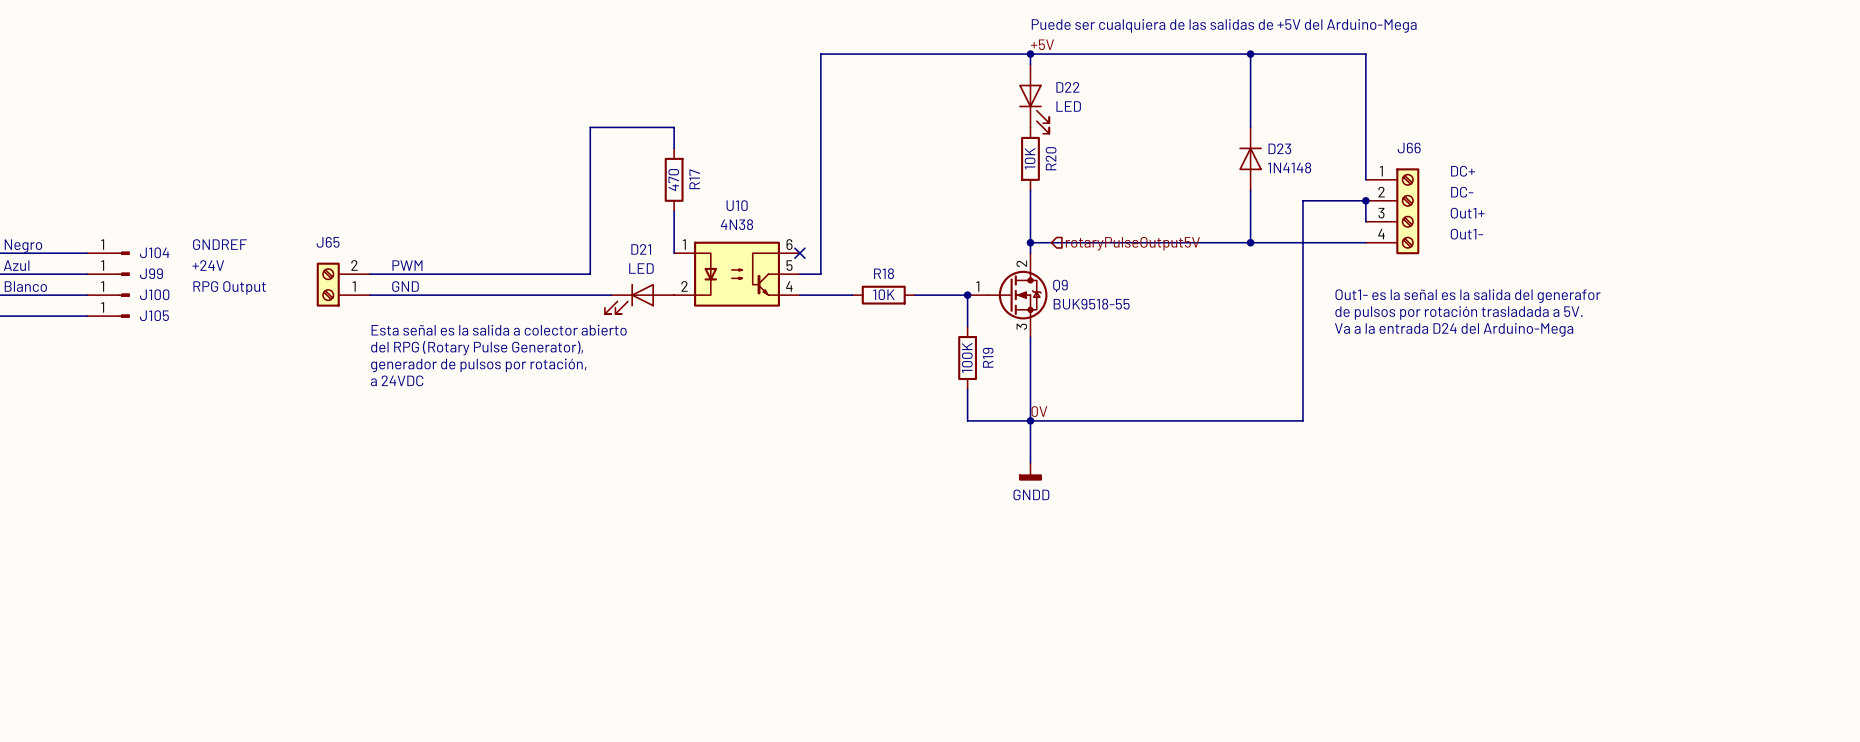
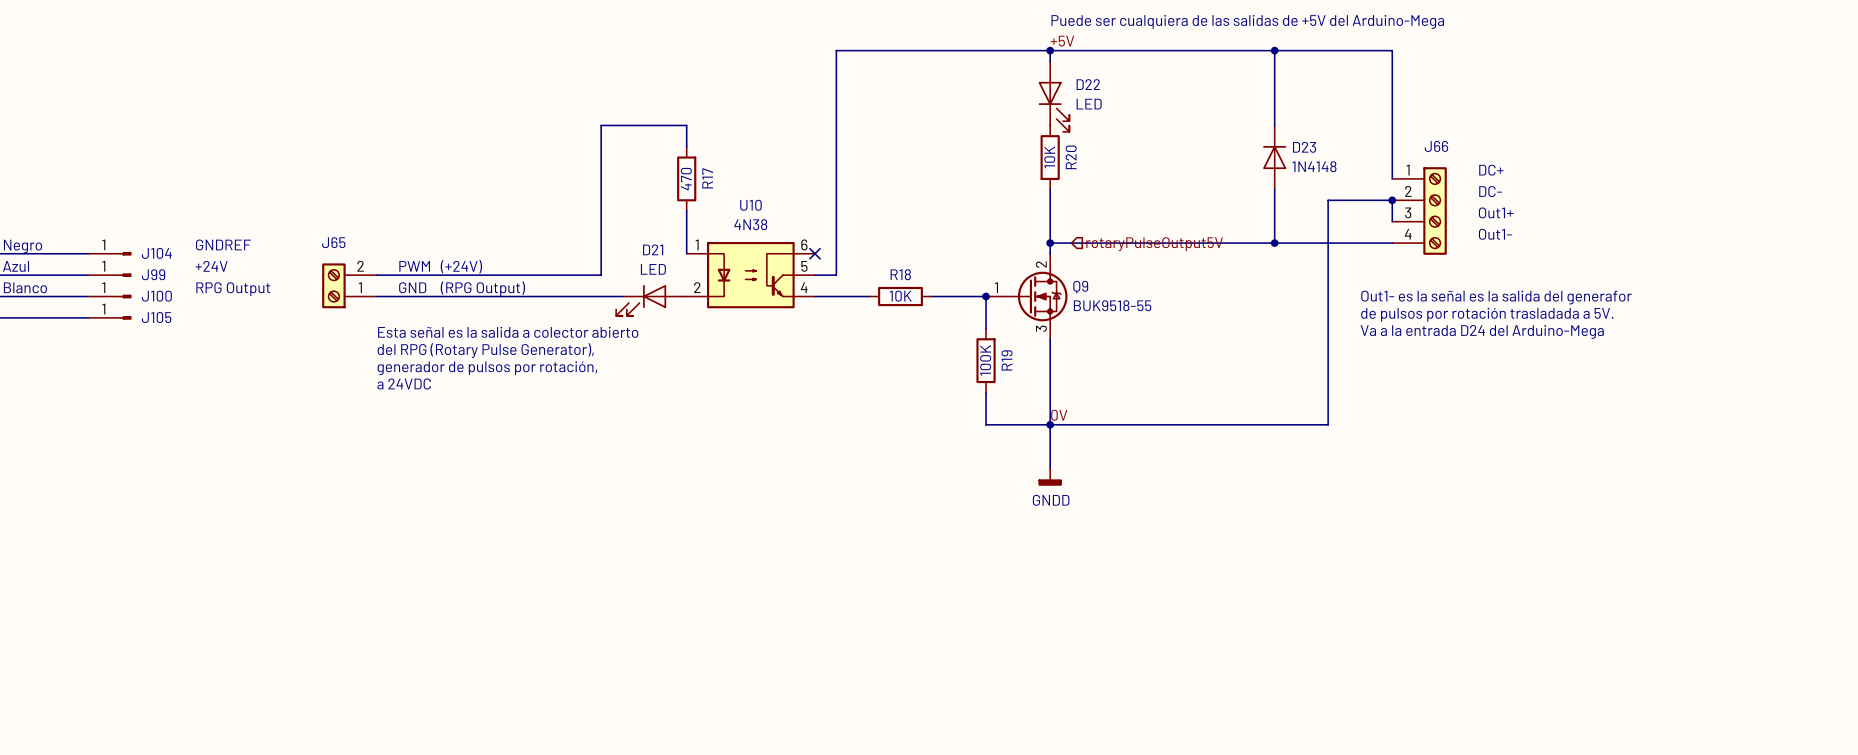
text: none -> (+24V) (461, 266)
text: none -> (RPG Output) (482, 288)

